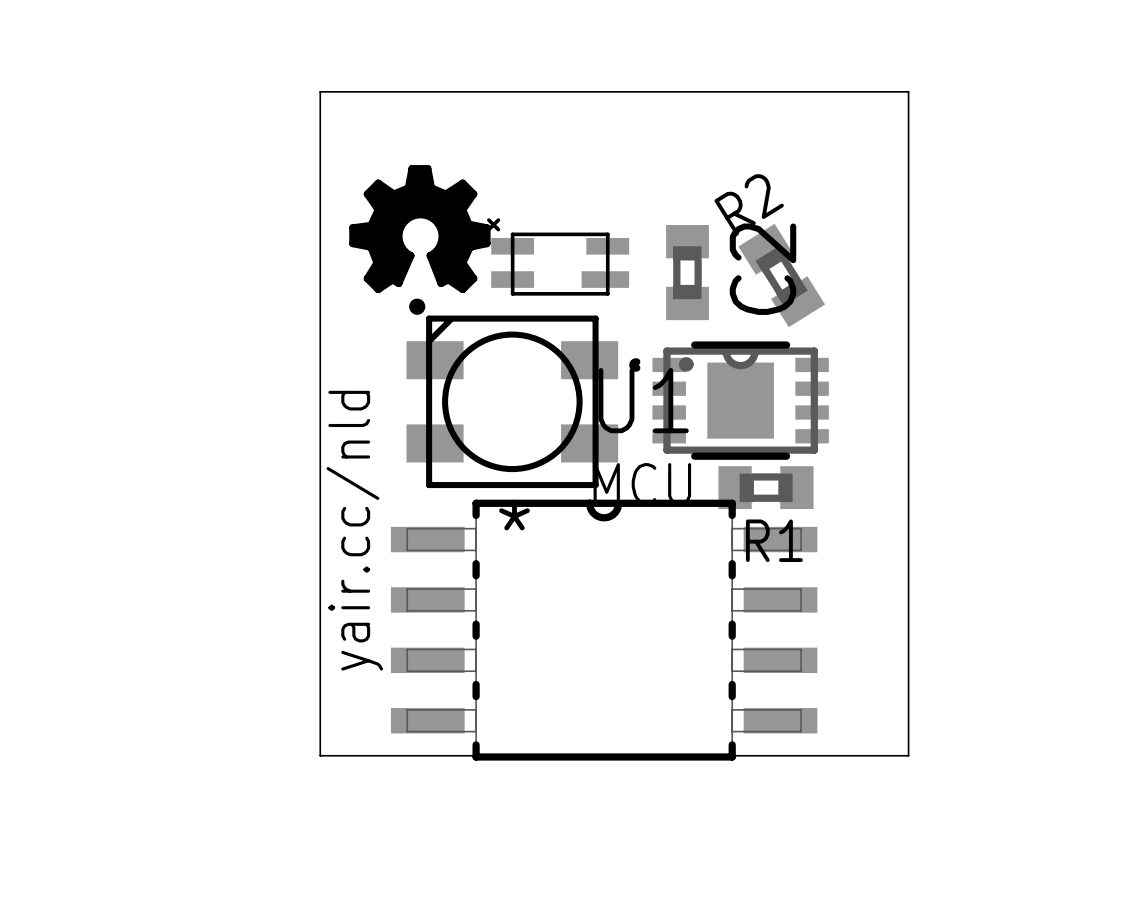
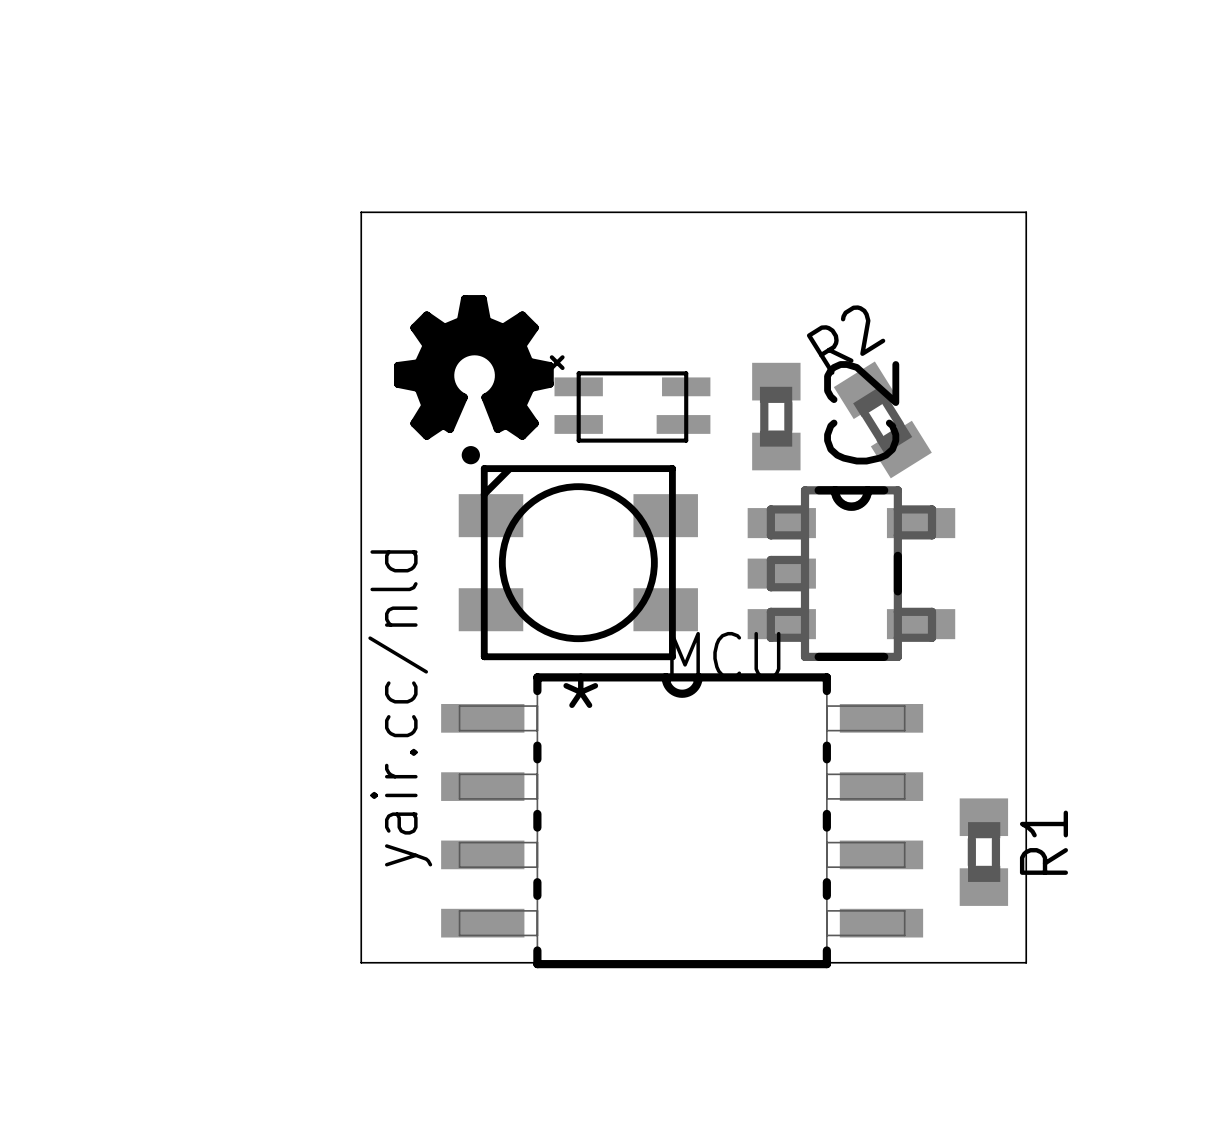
U1: (729, 400) -> none
part: none -> (851, 573)
R1 rotation: 0° (766, 487) -> 90° clockwise (983, 852)
R1 position: (766, 487) -> (983, 852)

